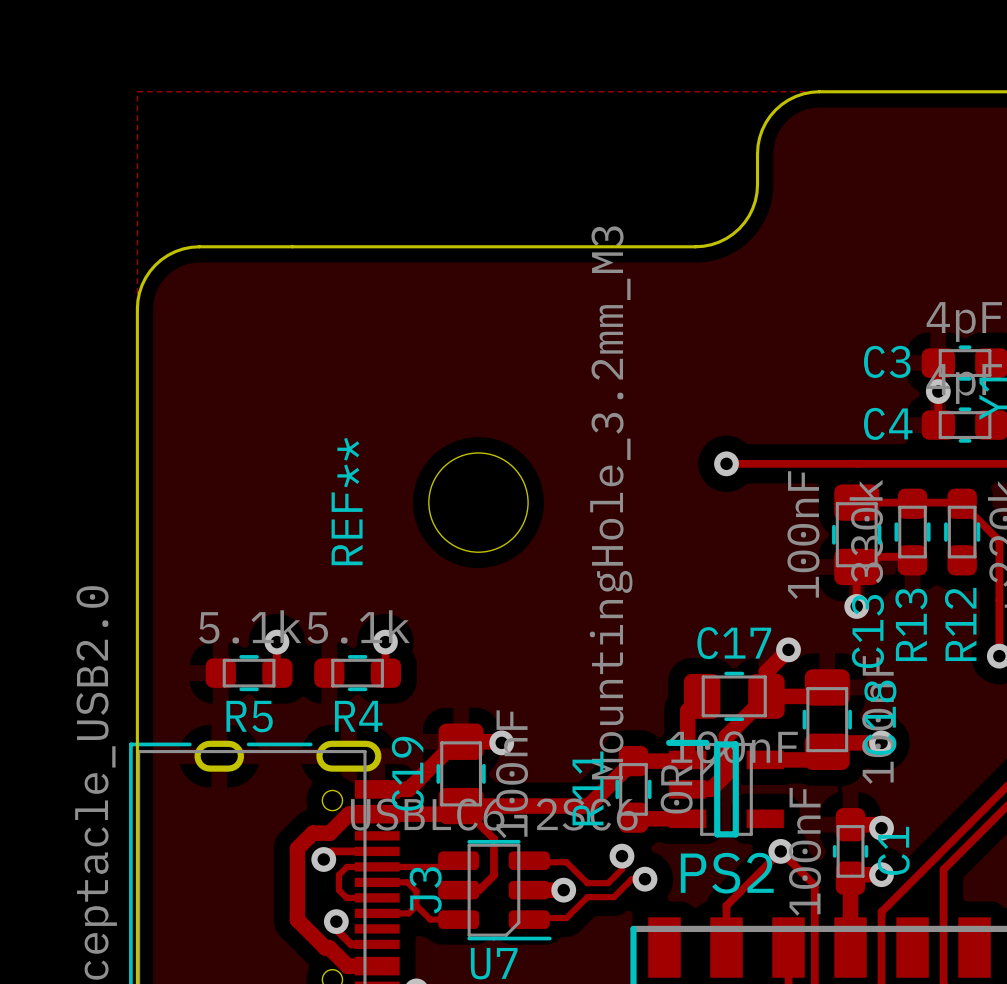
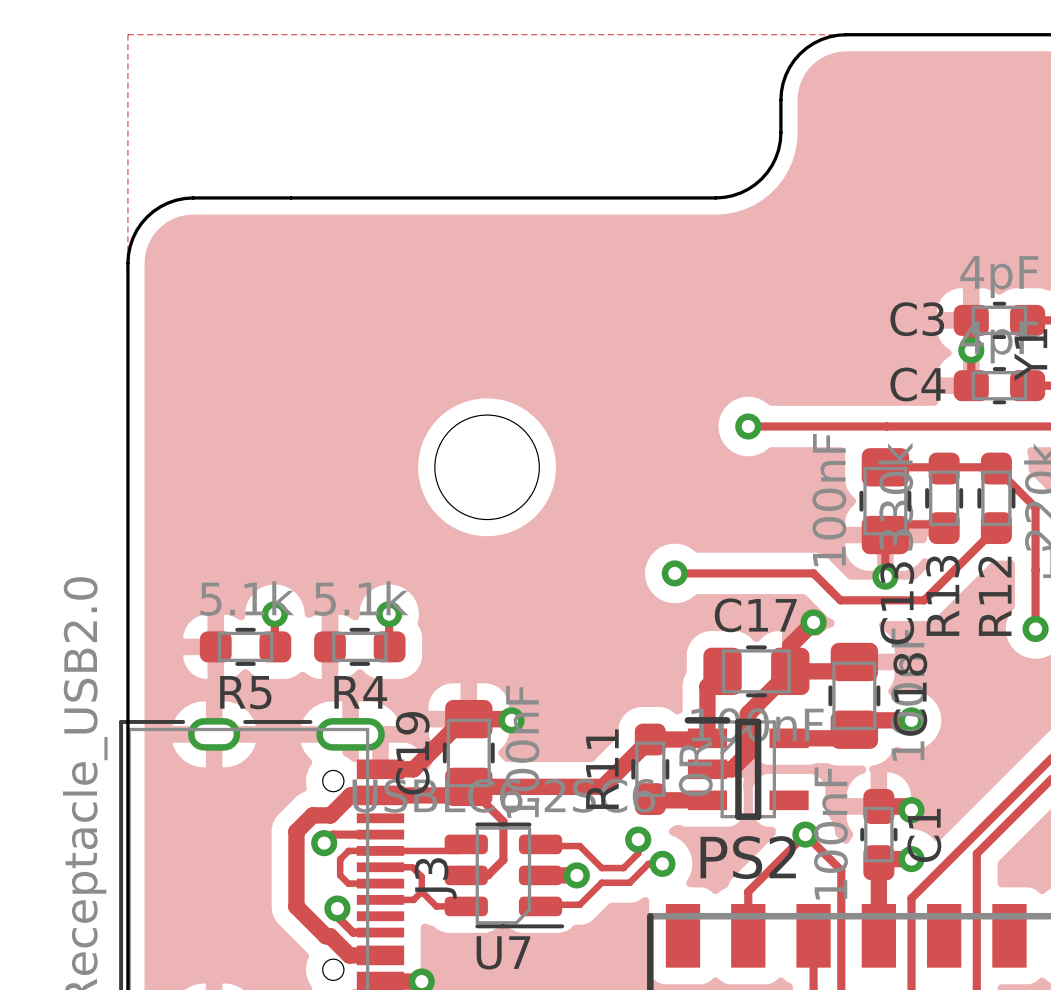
REF** name: REF** (347, 501) -> none
REF** value: MountingHole_3.2mm_M3 (611, 502) -> none
track: none -> (996, 528) (924, 600) (840, 600) (813, 573) (674, 573)
via: none -> (674, 573)

